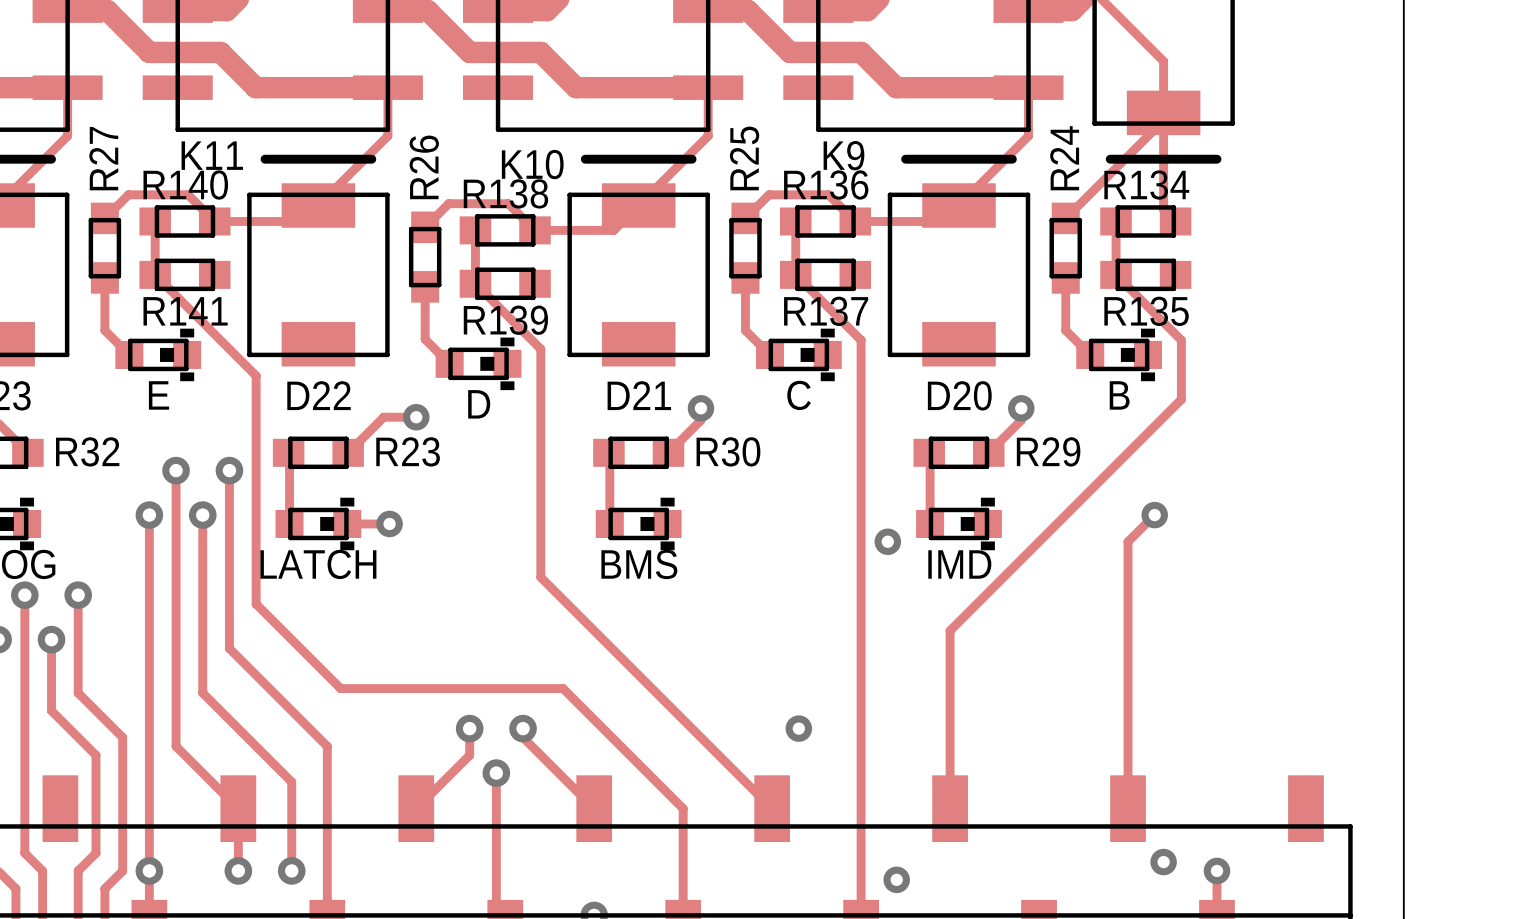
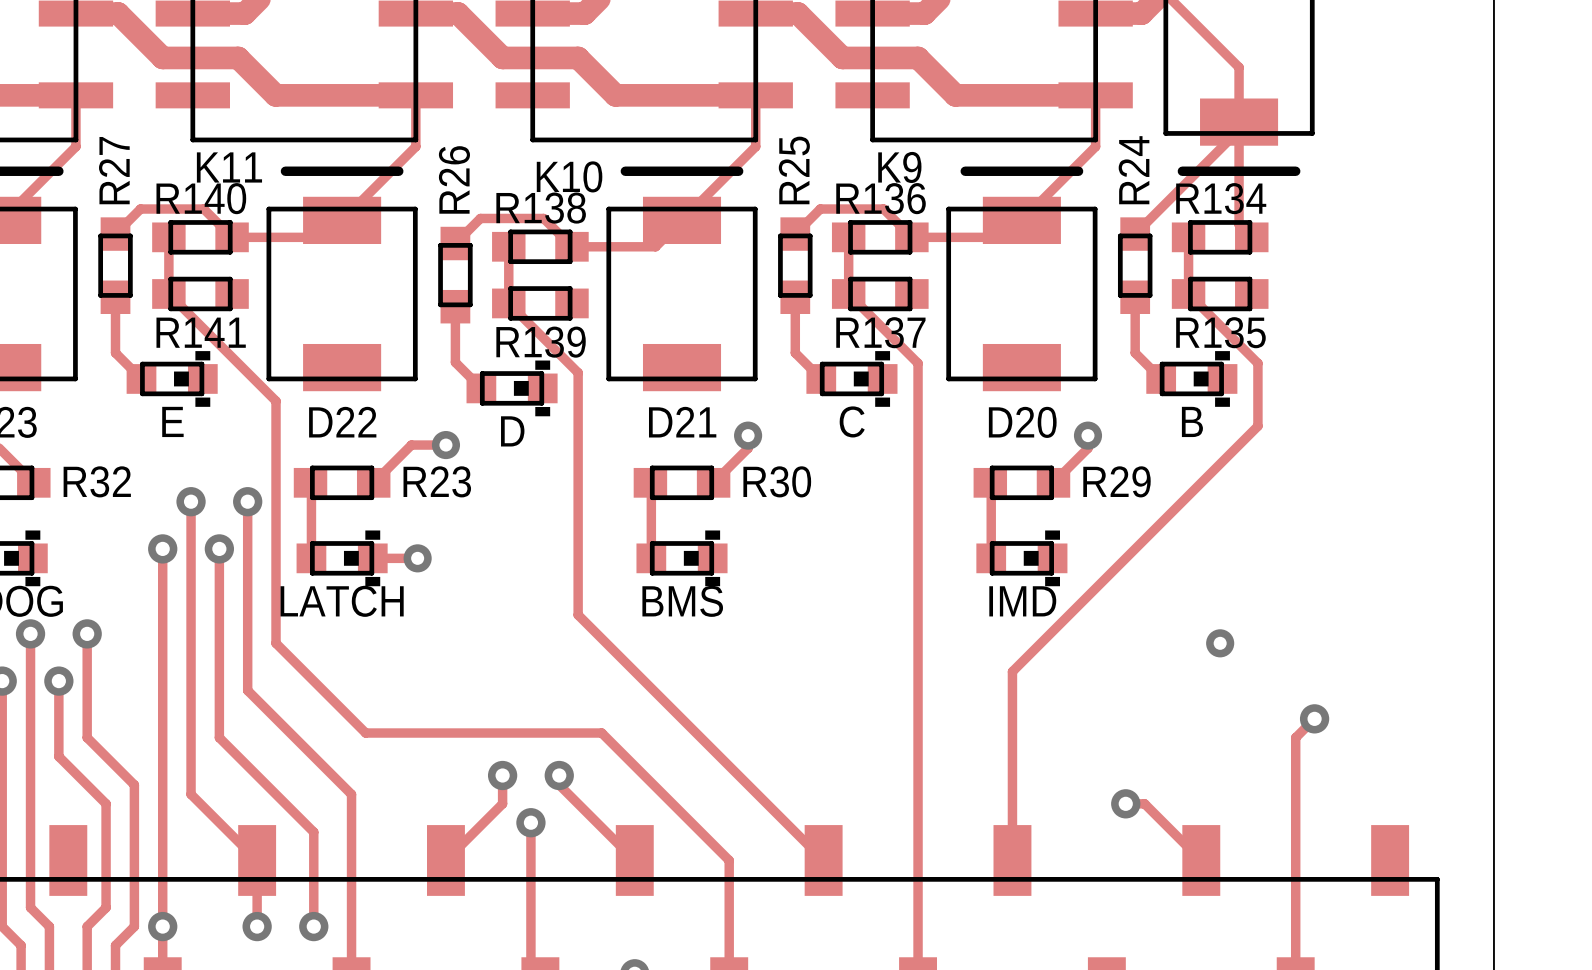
track: (1154, 515) (1128, 541) (1128, 808) -> (1125, 803) (1144, 803) (1201, 860)
via position: (1154, 515) -> (1220, 643)
via: (887, 541) -> none
track: none -> (1314, 718) (1295, 737) (1295, 926)
via: none -> (1314, 718)
via: (798, 728) -> none
via: none -> (1125, 803)
via: (1163, 862) -> none
via: (1216, 870) -> none
via: (896, 879) -> none

